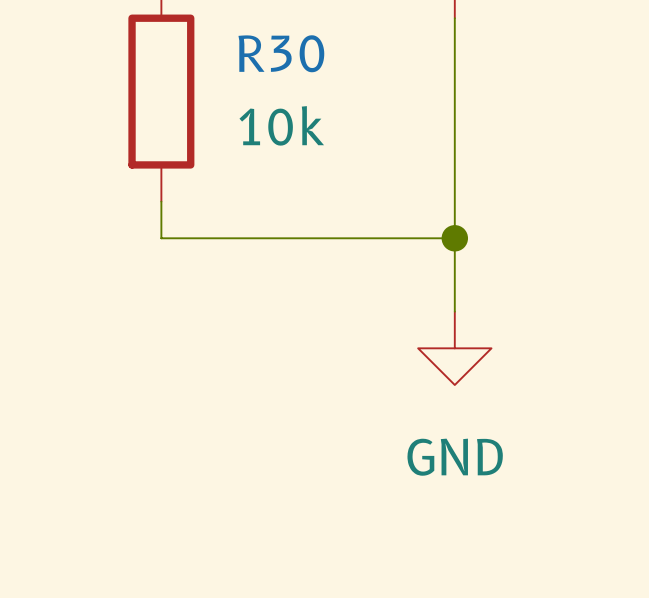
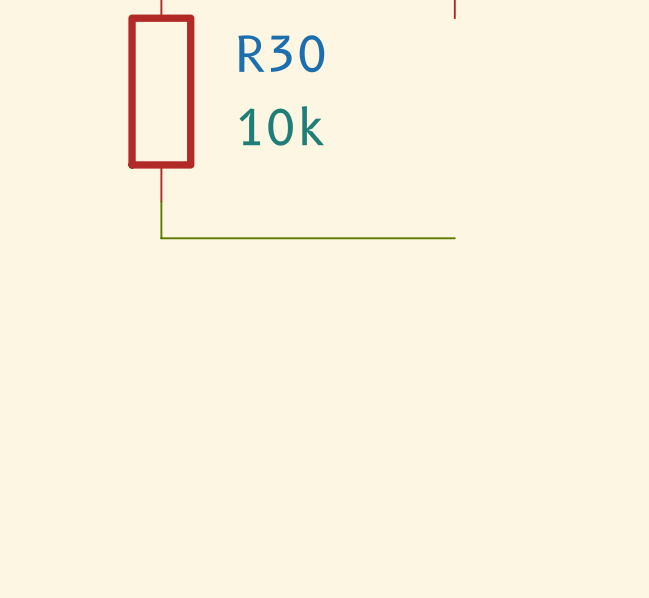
wire: (454, 18) (454, 311) -> none
junction: (454, 238) -> none
power symbol: GND (454, 348) -> none

